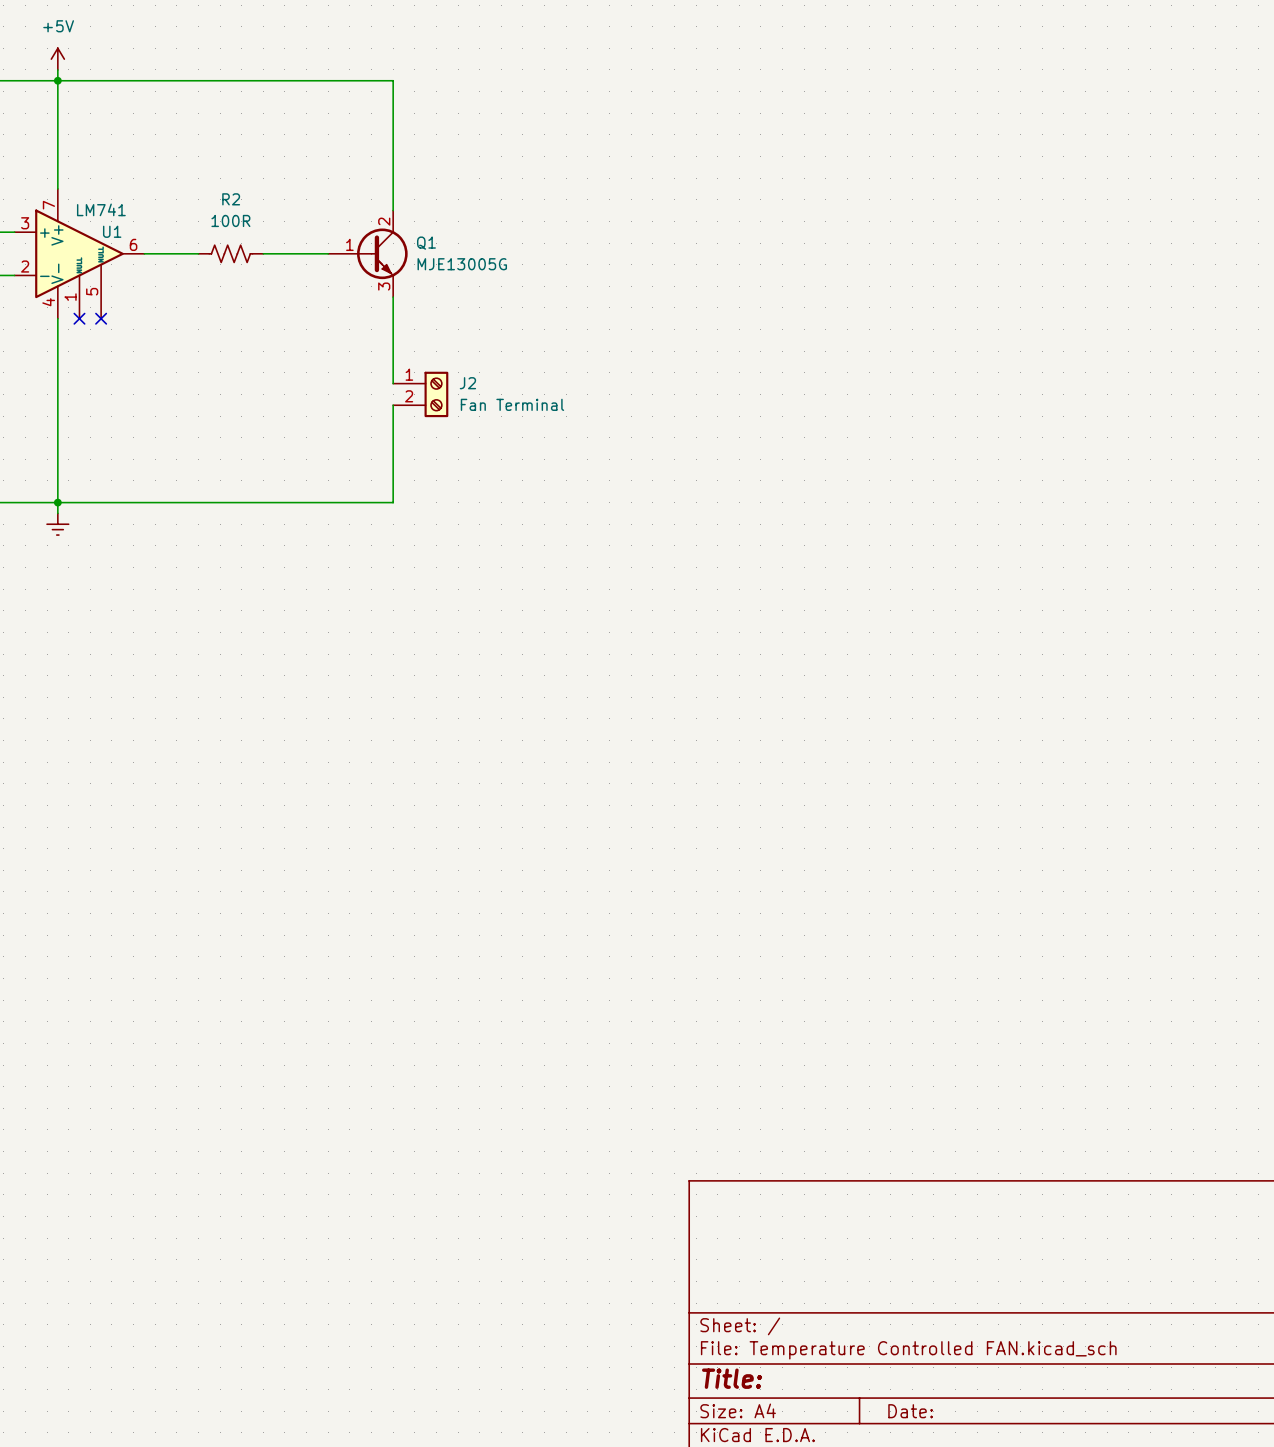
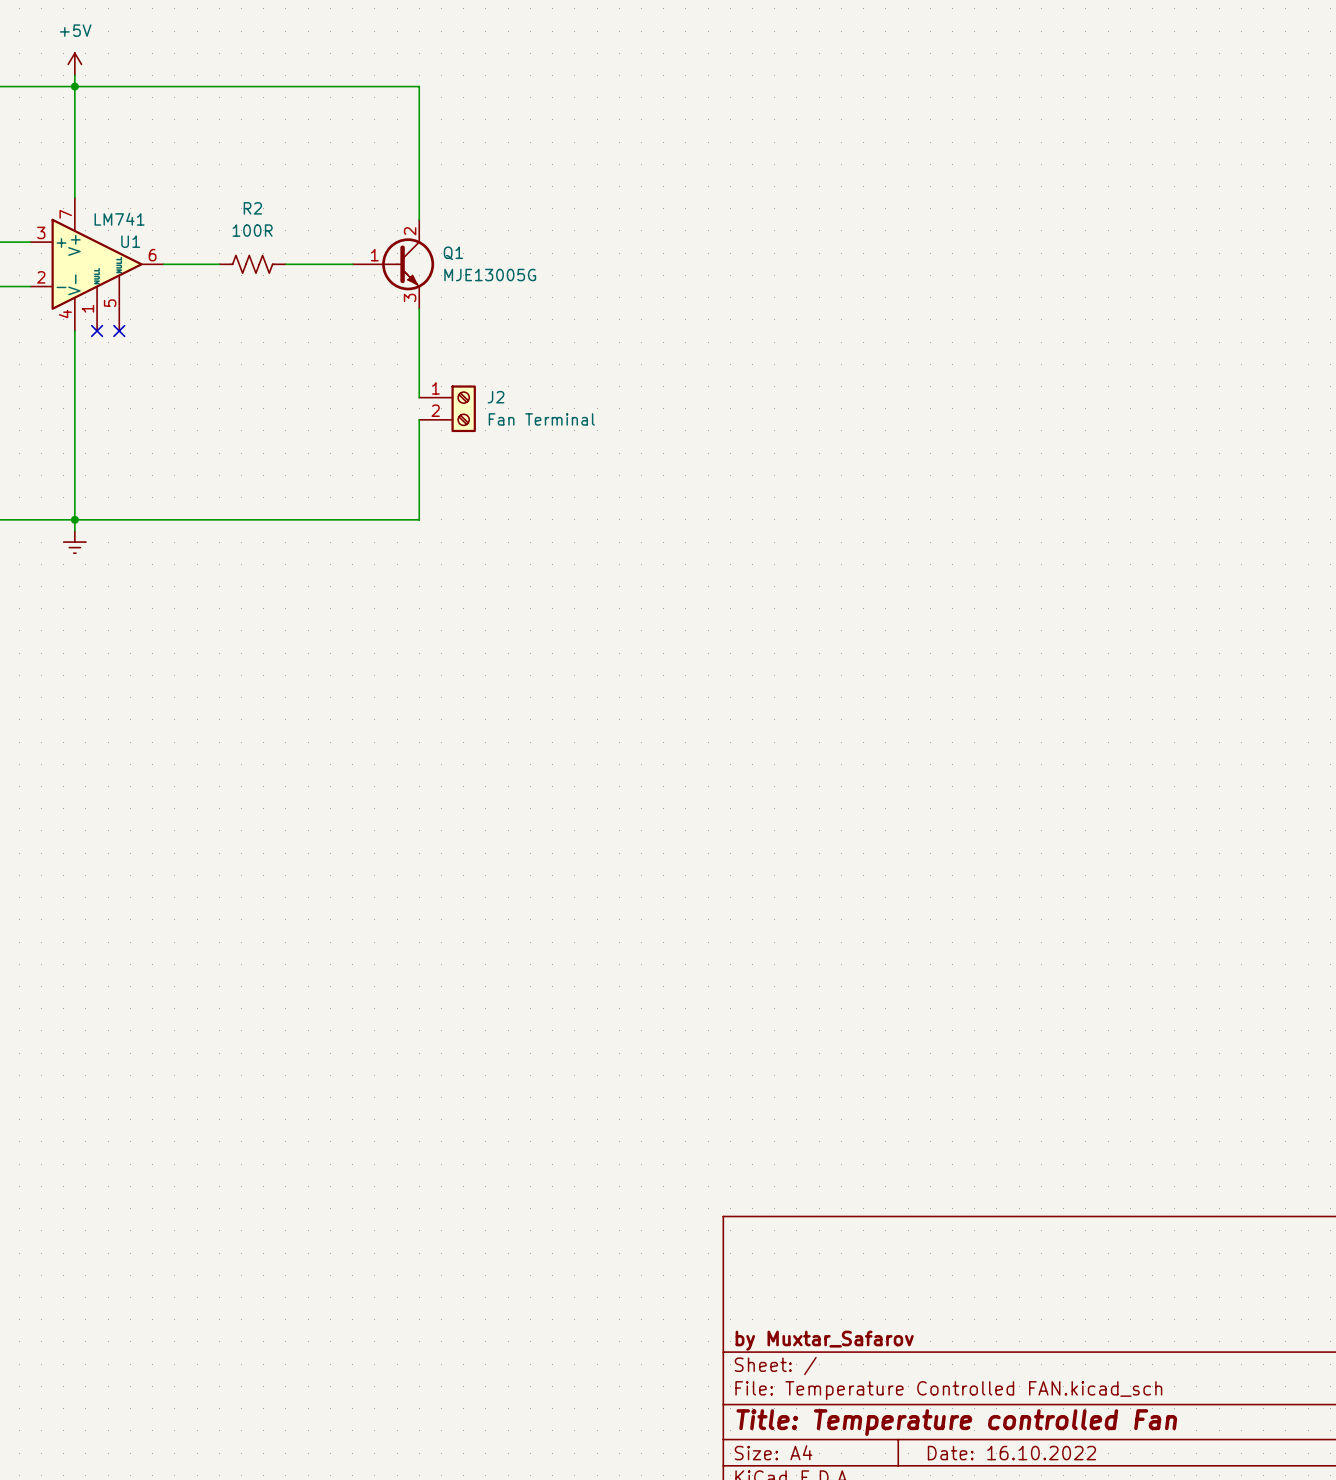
title block: none -> by Muxtar_Safarov (824, 1340)
title block: Title: (732, 1378) -> Title: Temperature controlled Fan (956, 1422)
title block: Date: (910, 1411) -> Date: 16.10.2022 (1011, 1453)

